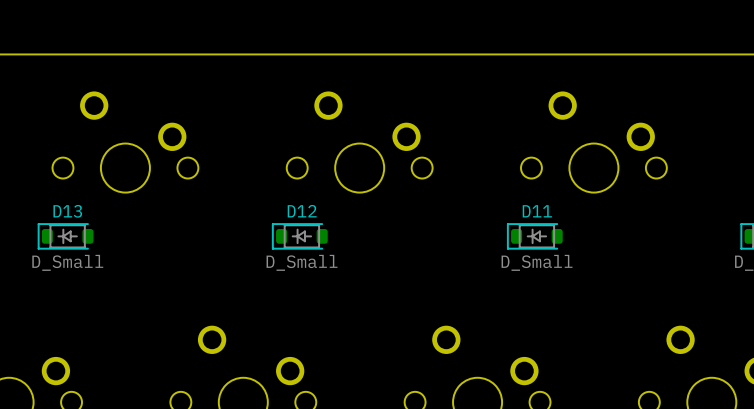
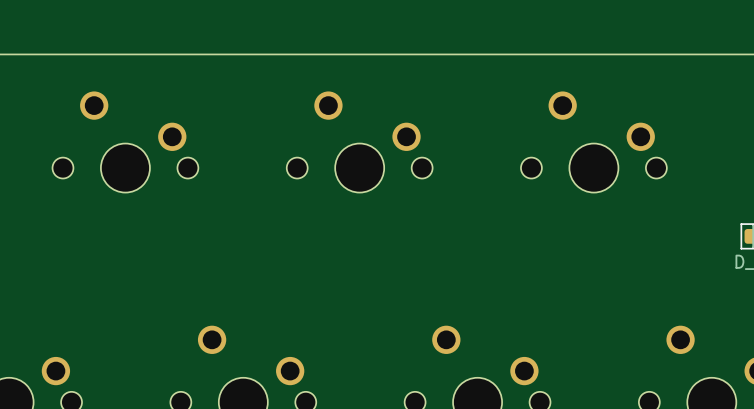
D13: D_Small (65, 236) -> none
D12: D_Small (299, 236) -> none
D11: D_Small (534, 236) -> none

